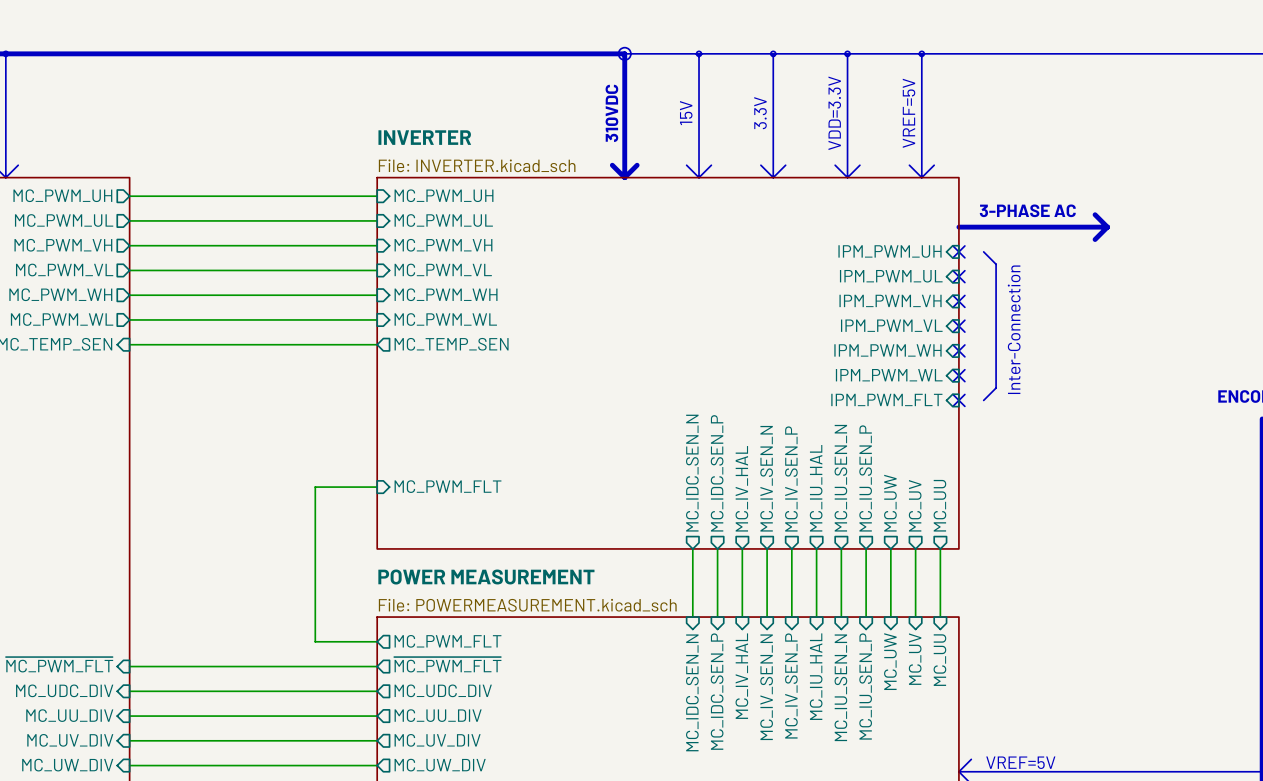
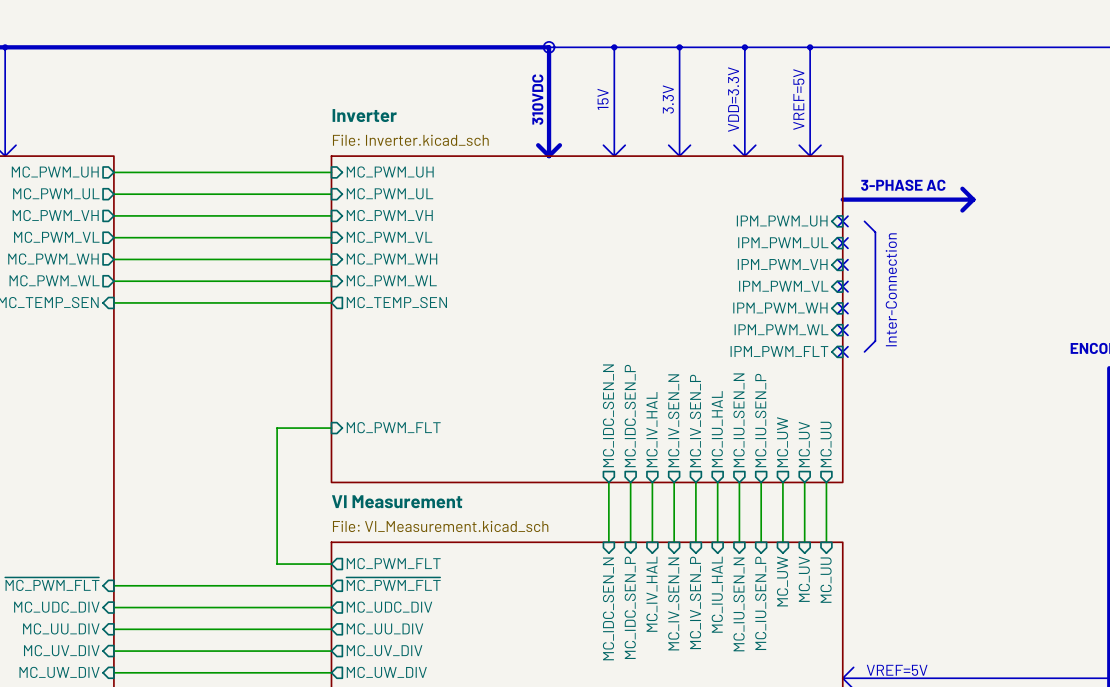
sheet INVERTER name: INVERTER (424, 137) -> Inverter (364, 115)
sheet INVERTER value: File: INVERTER.kicad_sch (477, 165) -> File: Inverter.kicad_sch (410, 140)
sheet POWER MEASUREMENT name: POWER MEASUREMENT (486, 577) -> VI Measurement (397, 501)
sheet POWER MEASUREMENT value: File: POWERMEASUREMENT.kicad_sch (527, 605) -> File: VI_Measurement.kicad_sch (440, 526)

